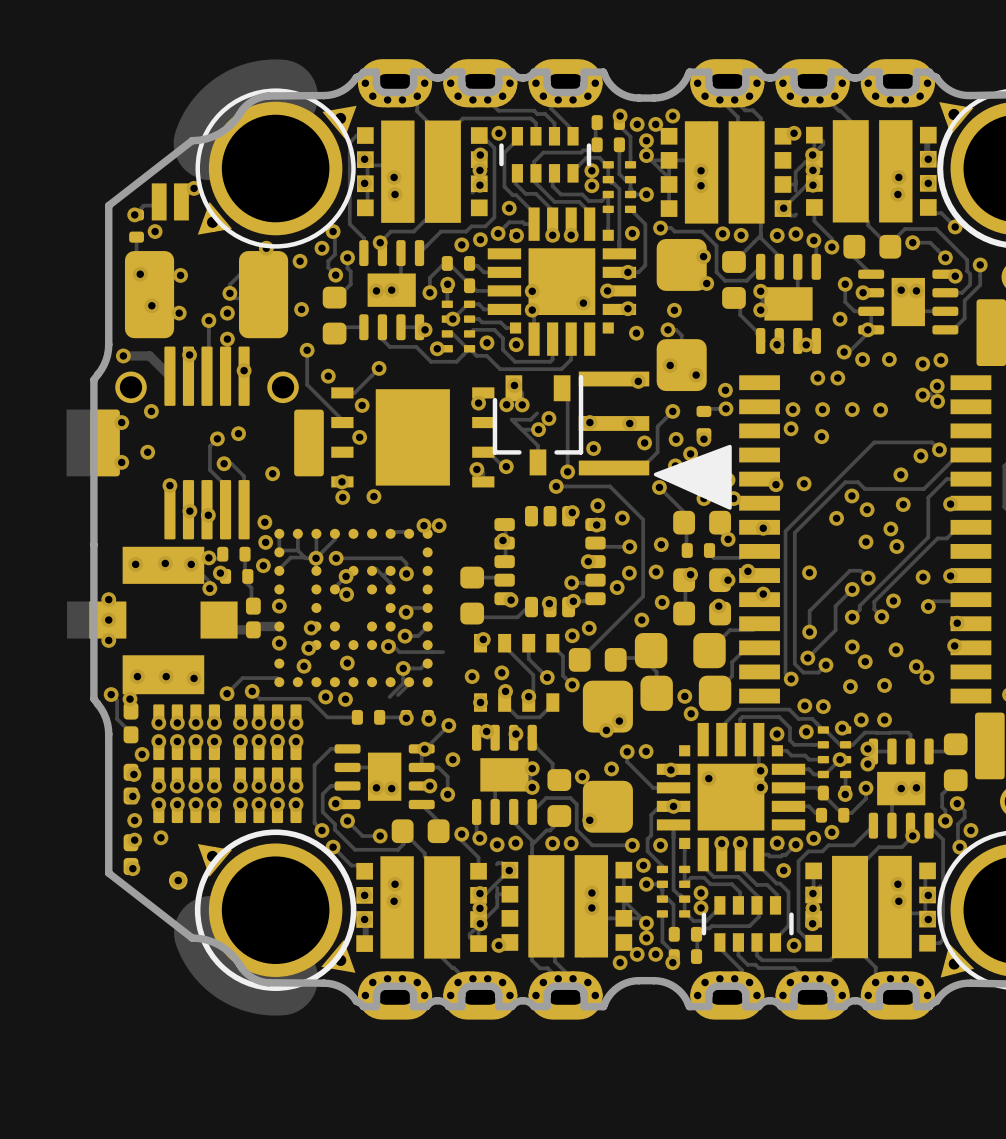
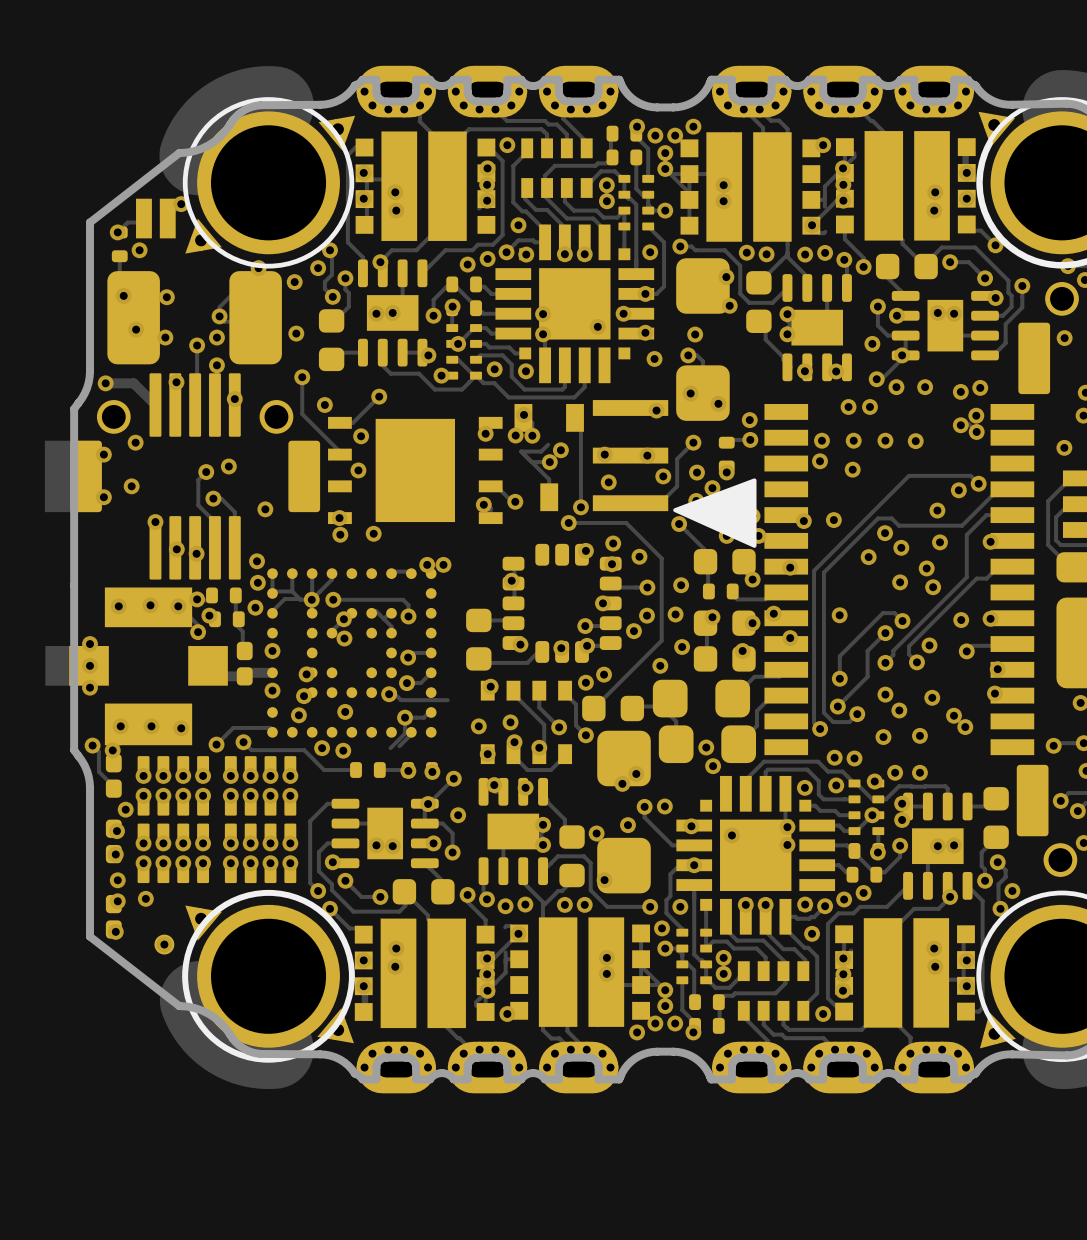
part footprint: [499, 126, 592, 183] -> [521, 138, 593, 198]
part footprint: [492, 374, 584, 476] -> [514, 404, 584, 512]
part footprint: [701, 896, 794, 952] -> [737, 961, 810, 1021]

